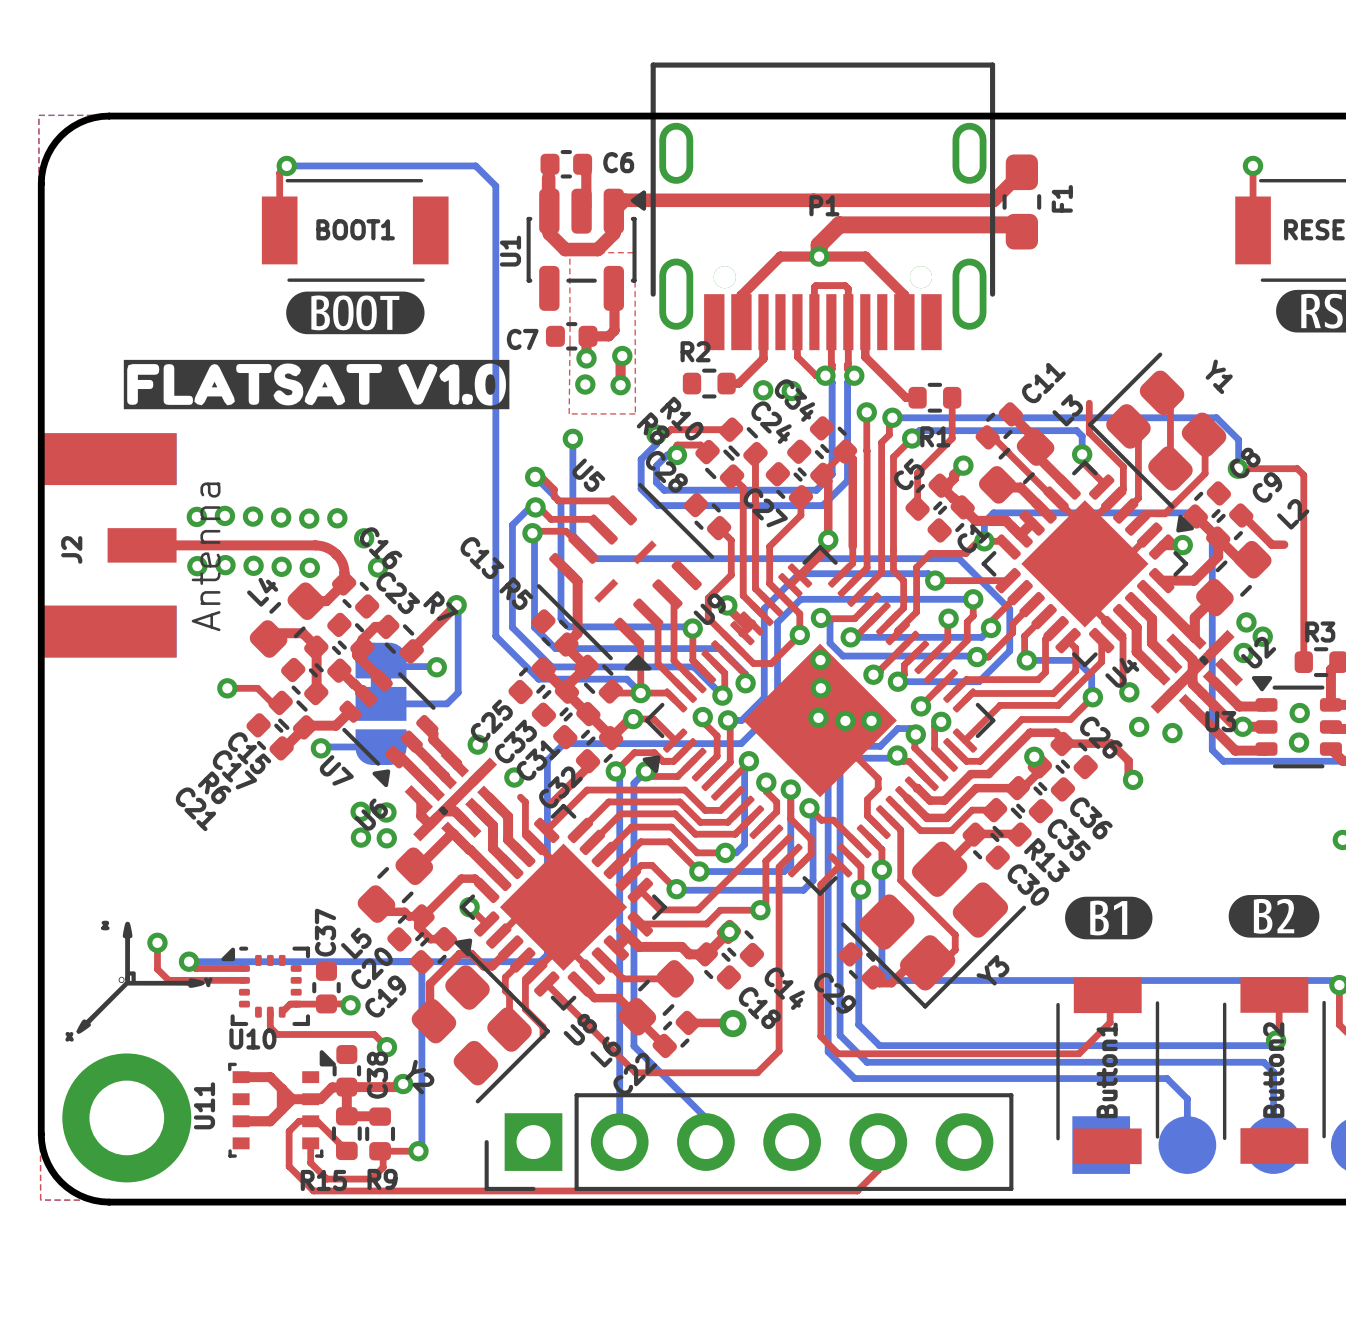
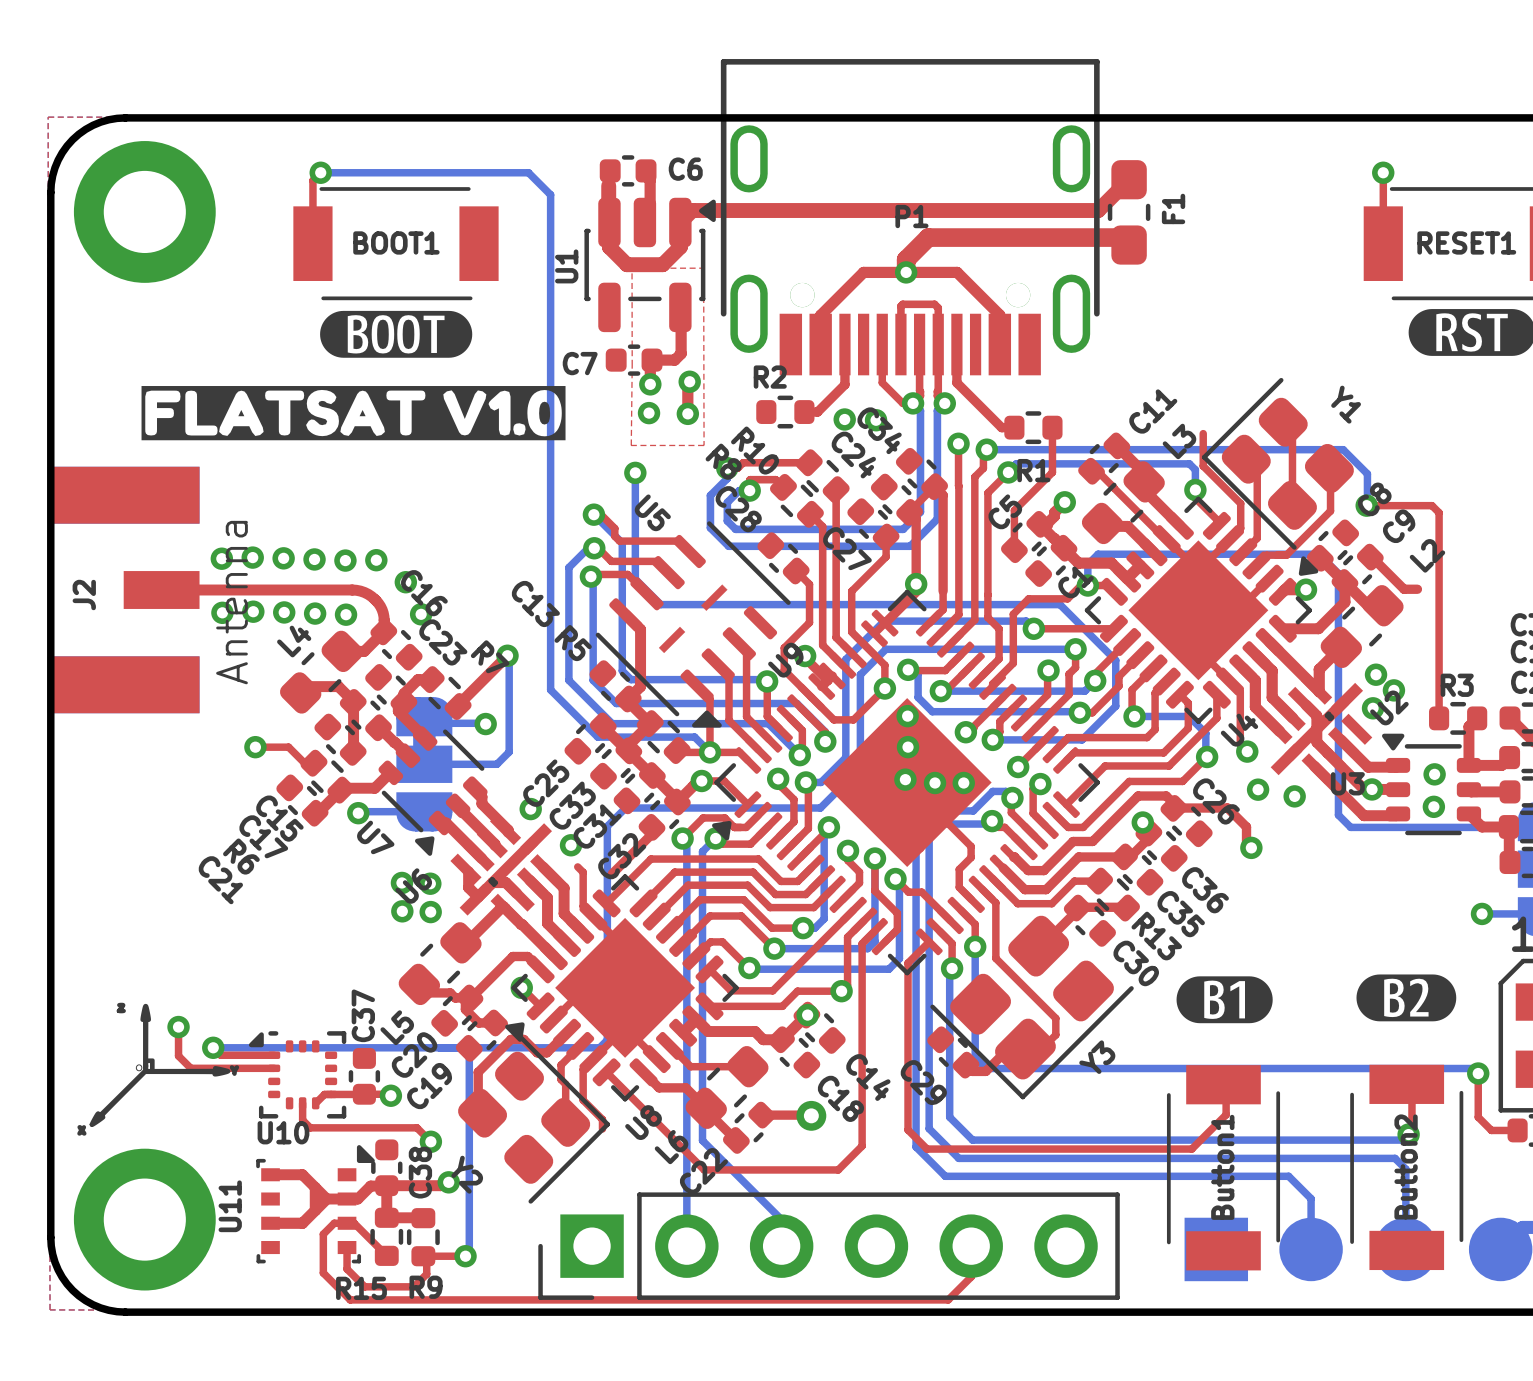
part: none -> (144, 211)

